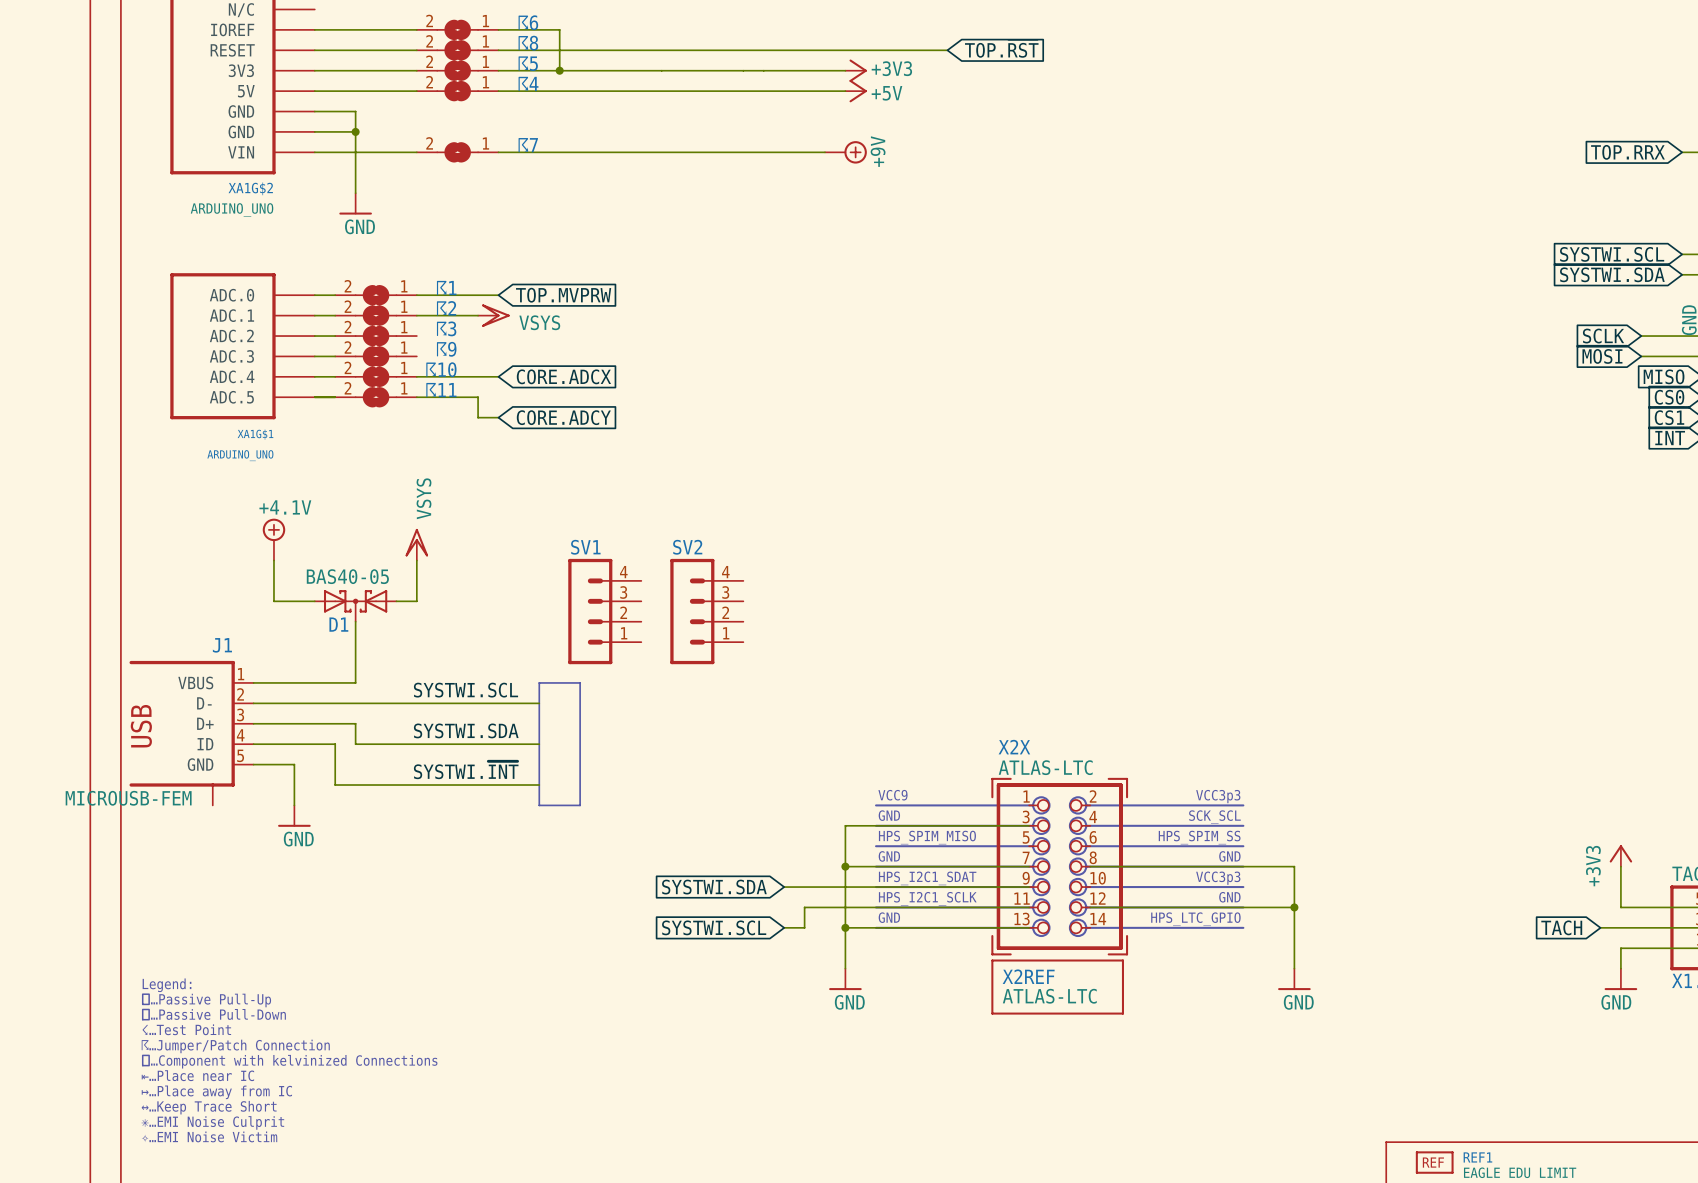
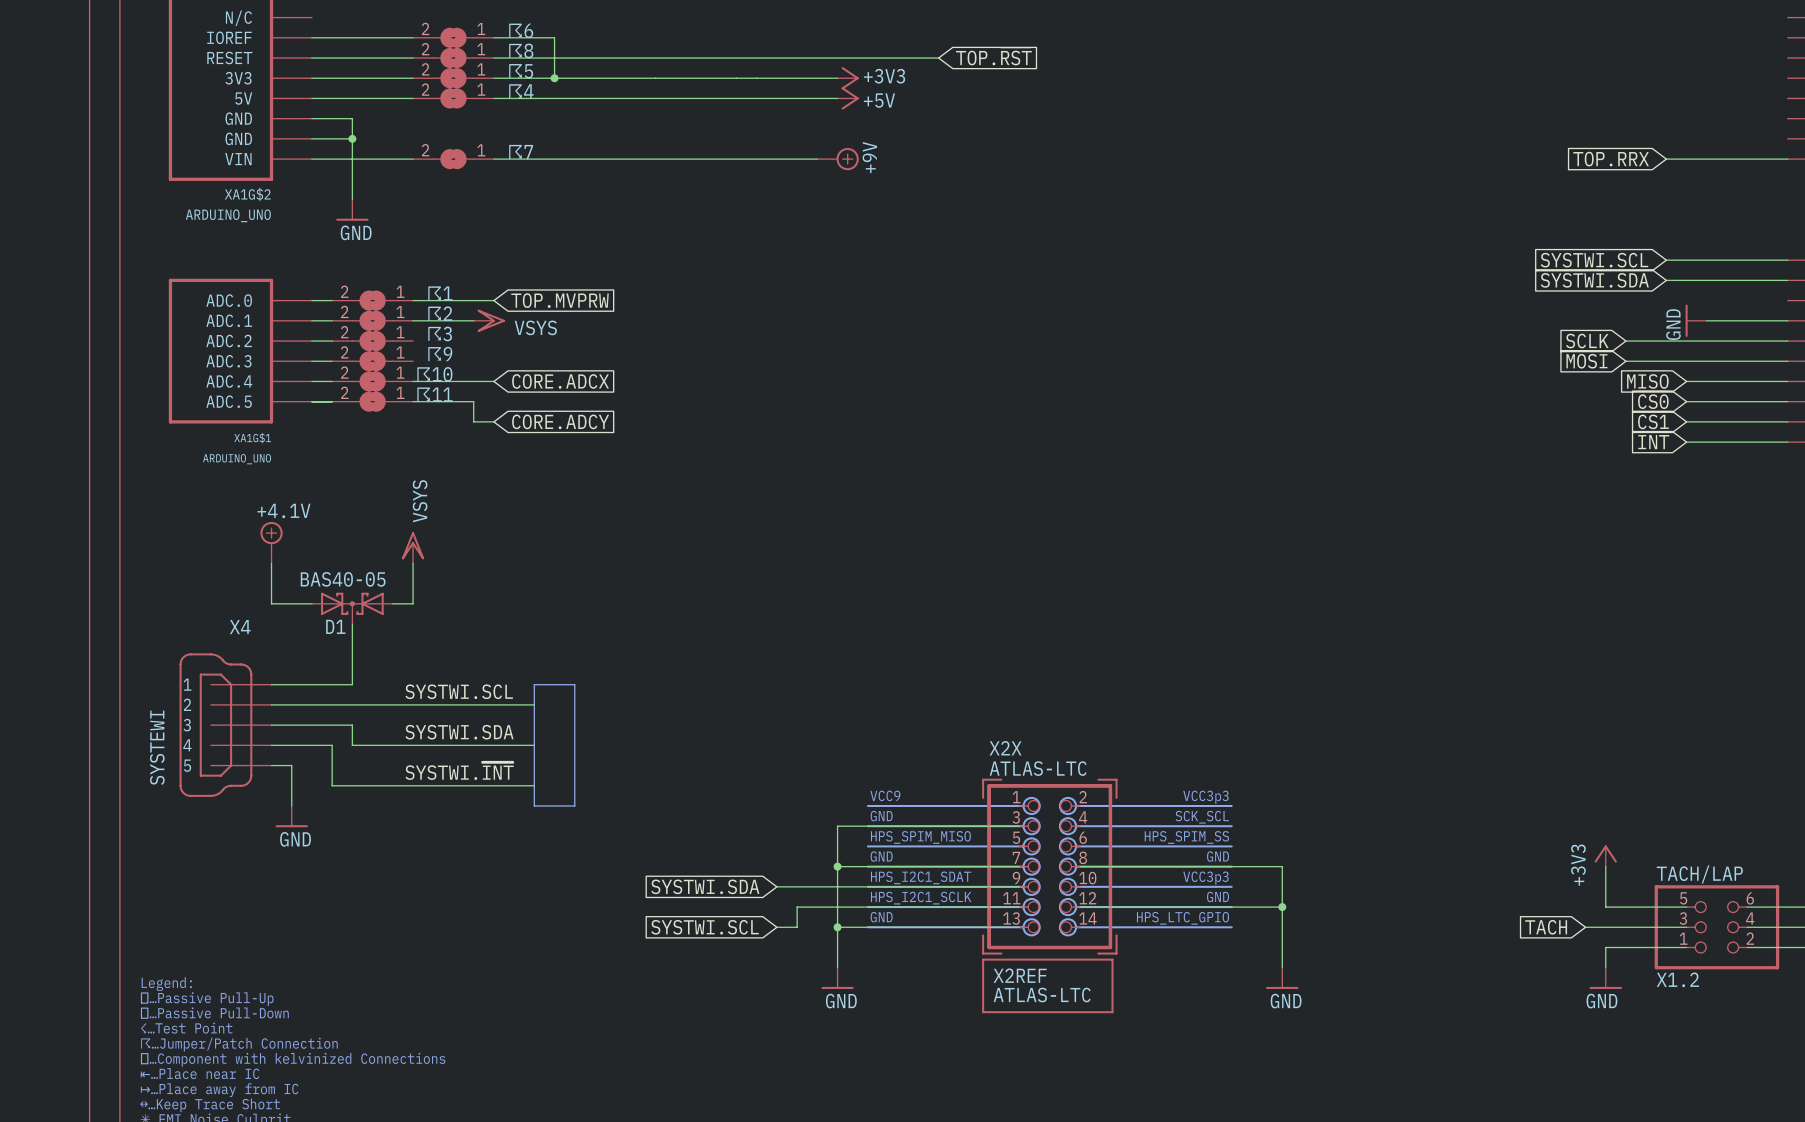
SV1: (604, 611) -> none
SV2: (706, 611) -> none
X4: none -> SYSTEWI (225, 725)
J1: MICROUSB-FEM (191, 733) -> none

